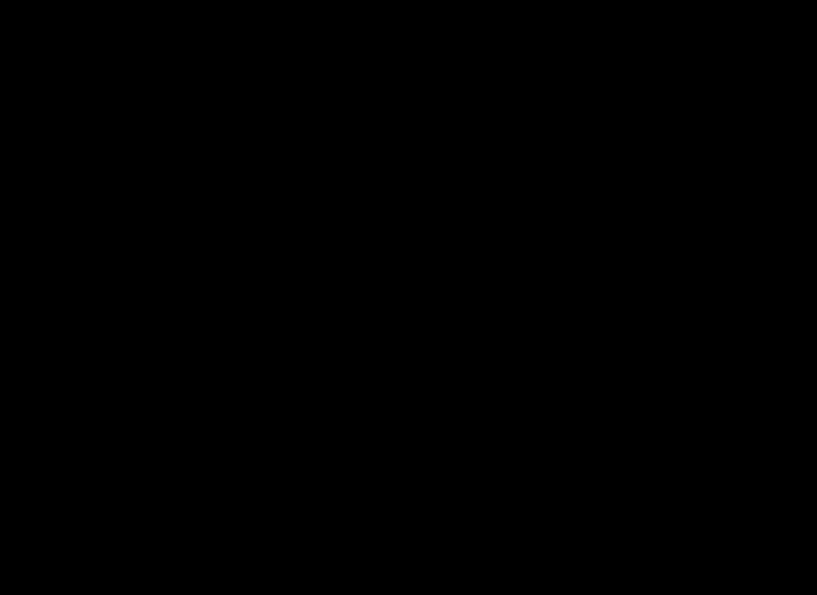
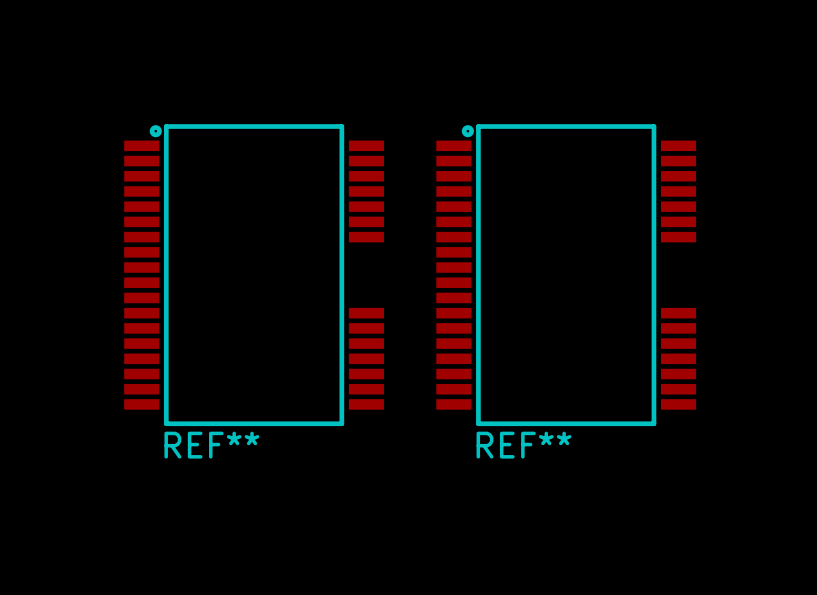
REF**: none -> (254, 275)
REF**: none -> (566, 275)

